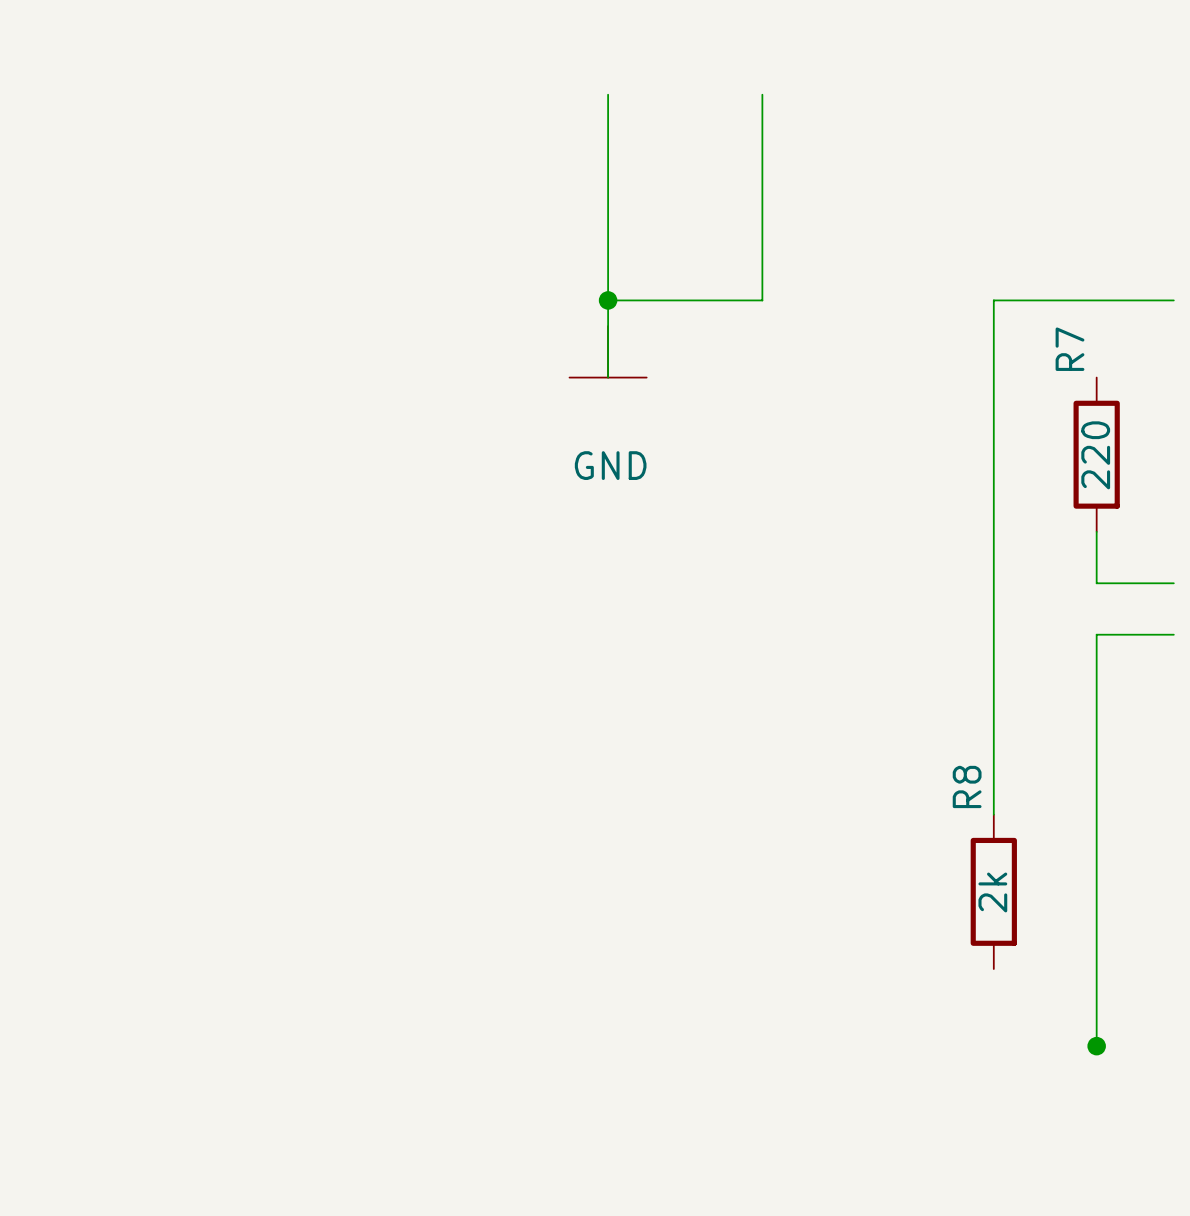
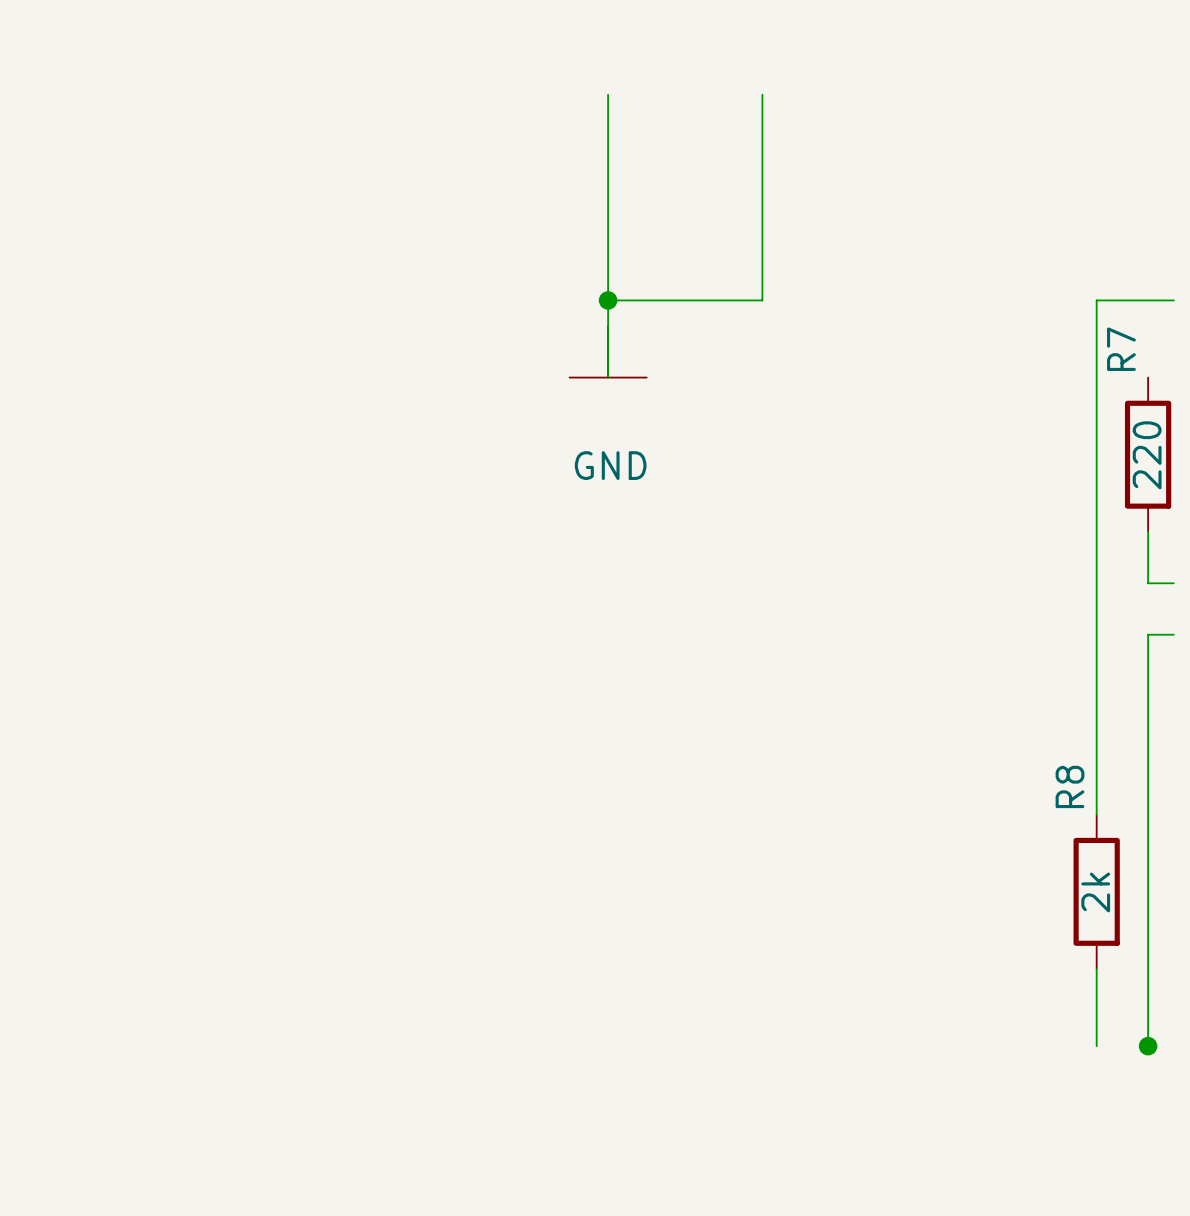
wire: (1096, 300) (993, 300) (993, 814) -> (1096, 300) (1096, 531)
R7 position: (1096, 454) -> (1148, 454)
wire: (1096, 583) (1148, 583) -> (1148, 531) (1148, 583)
wire: (1096, 634) (1148, 634) -> (1096, 634) (1096, 583)
wire: none -> (1148, 634) (1148, 1046)
wire: (1096, 814) (1096, 969) -> none
R8 position: (993, 891) -> (1096, 891)
junction position: (1096, 1046) -> (1148, 1046)

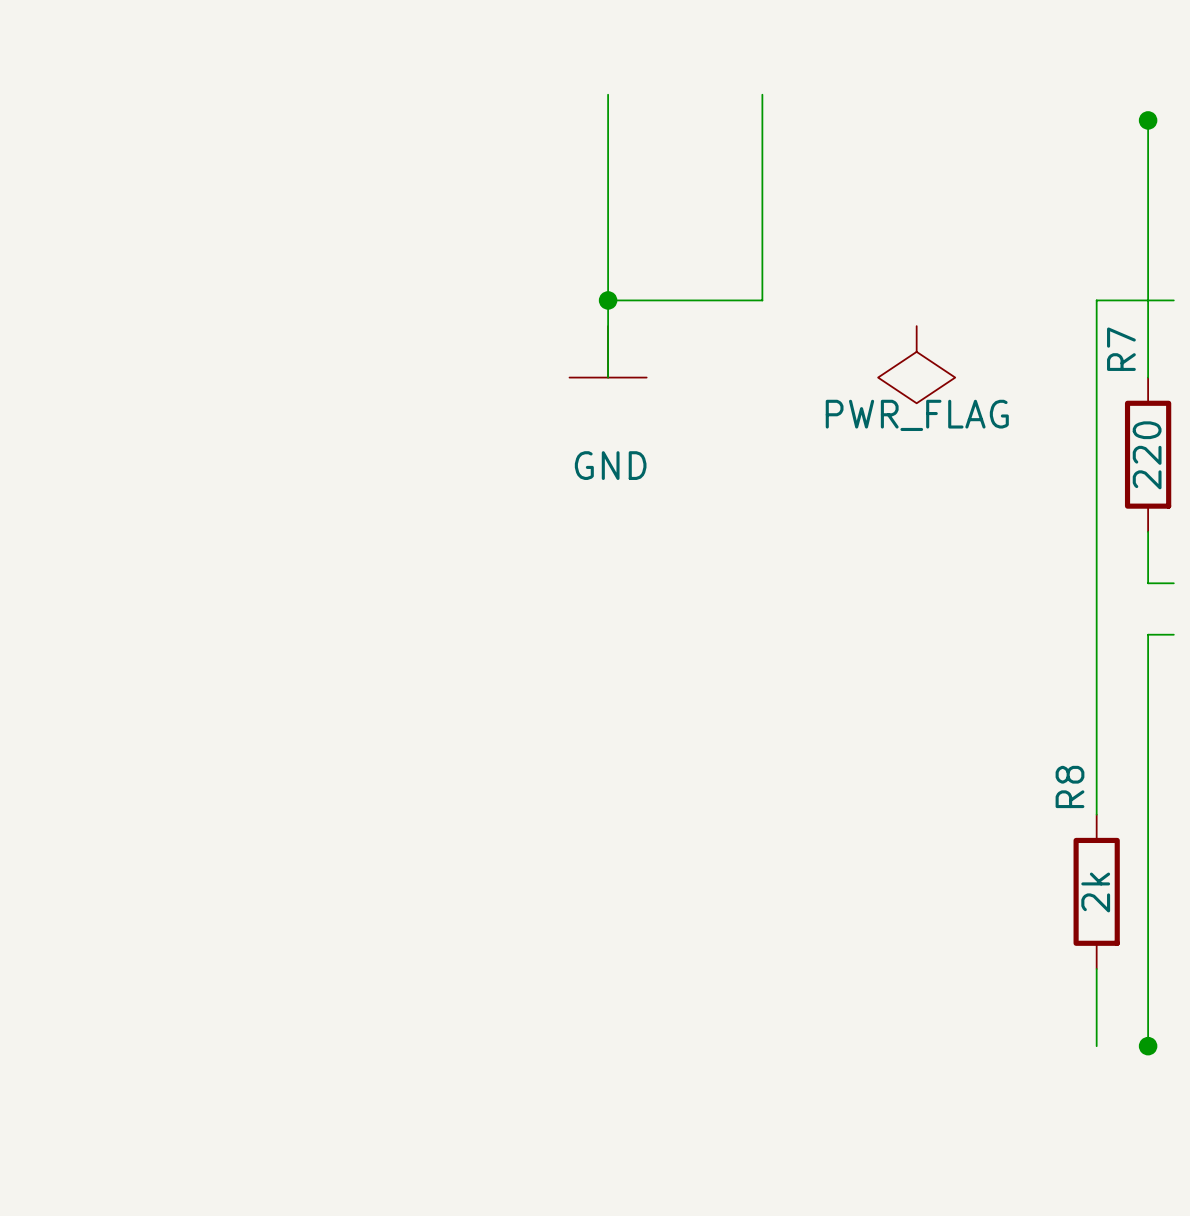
wire: none -> (1148, 120) (1148, 377)
junction: none -> (1148, 120)
power symbol: none -> PWR_FLAG (916, 364)

